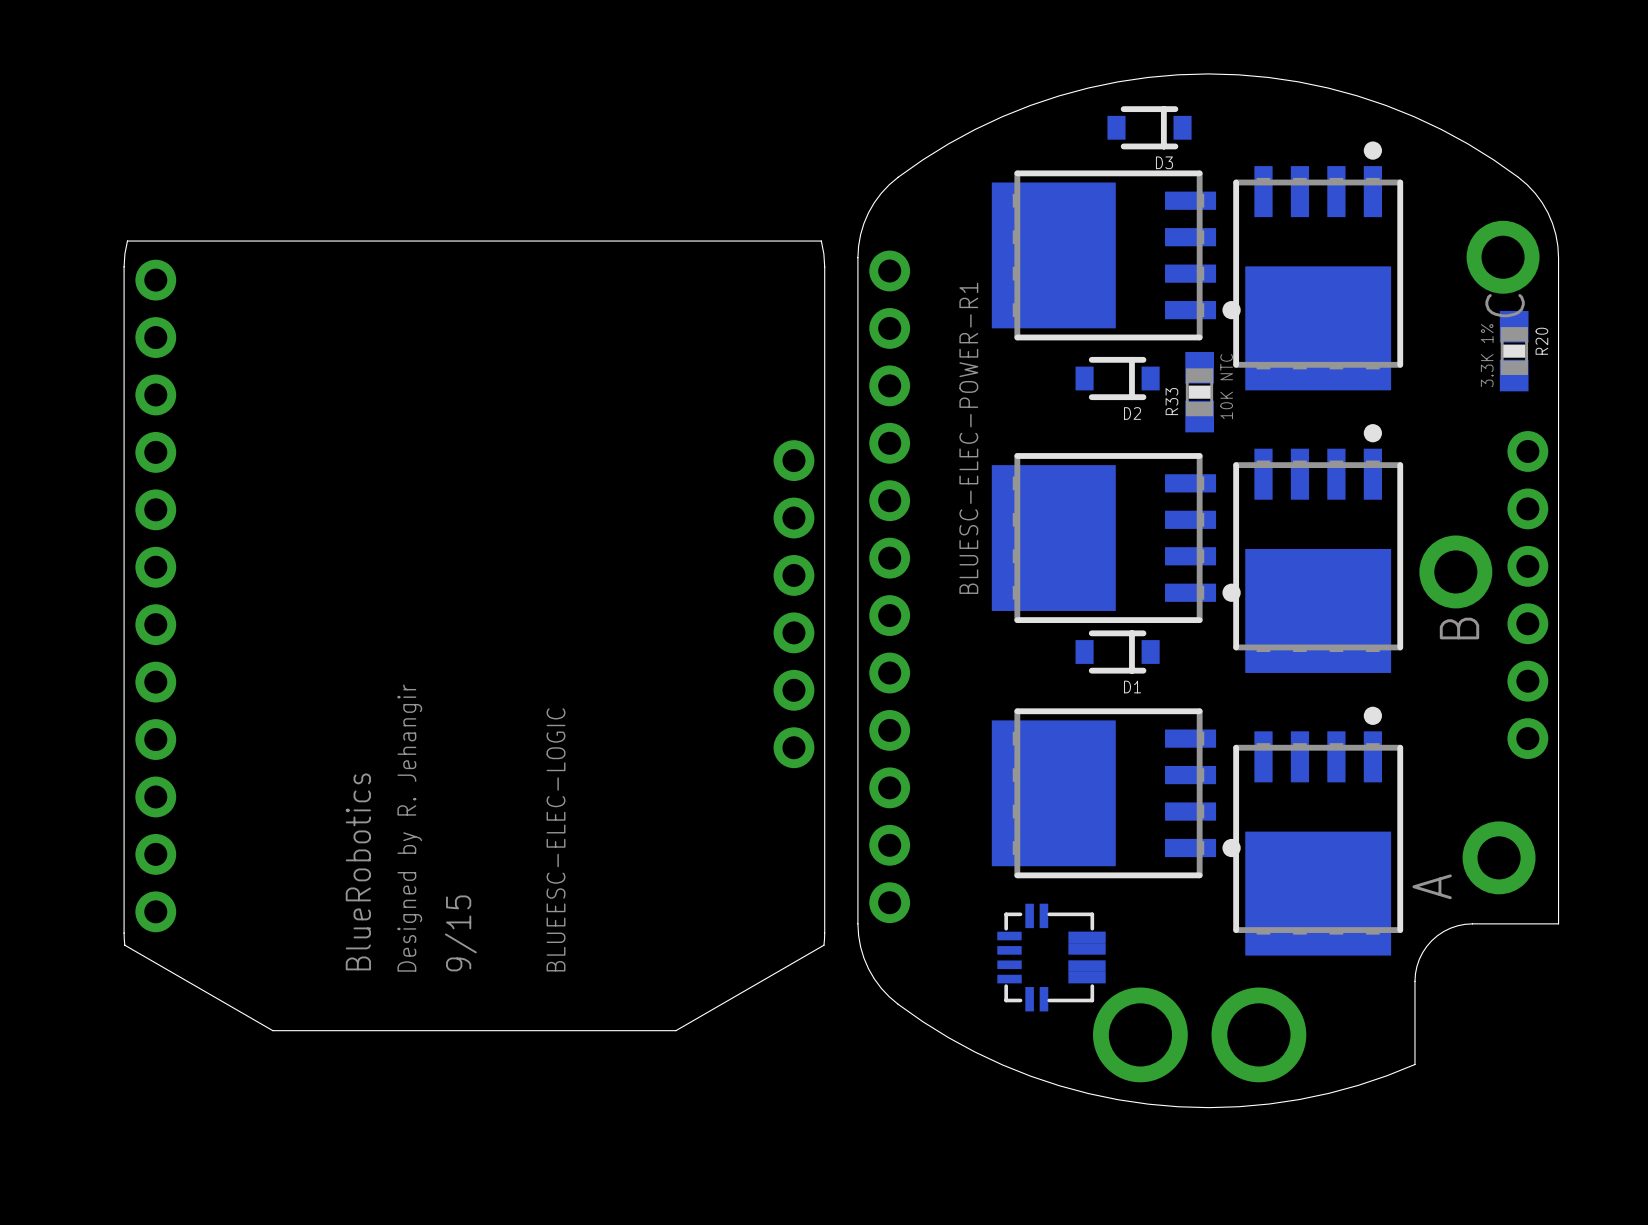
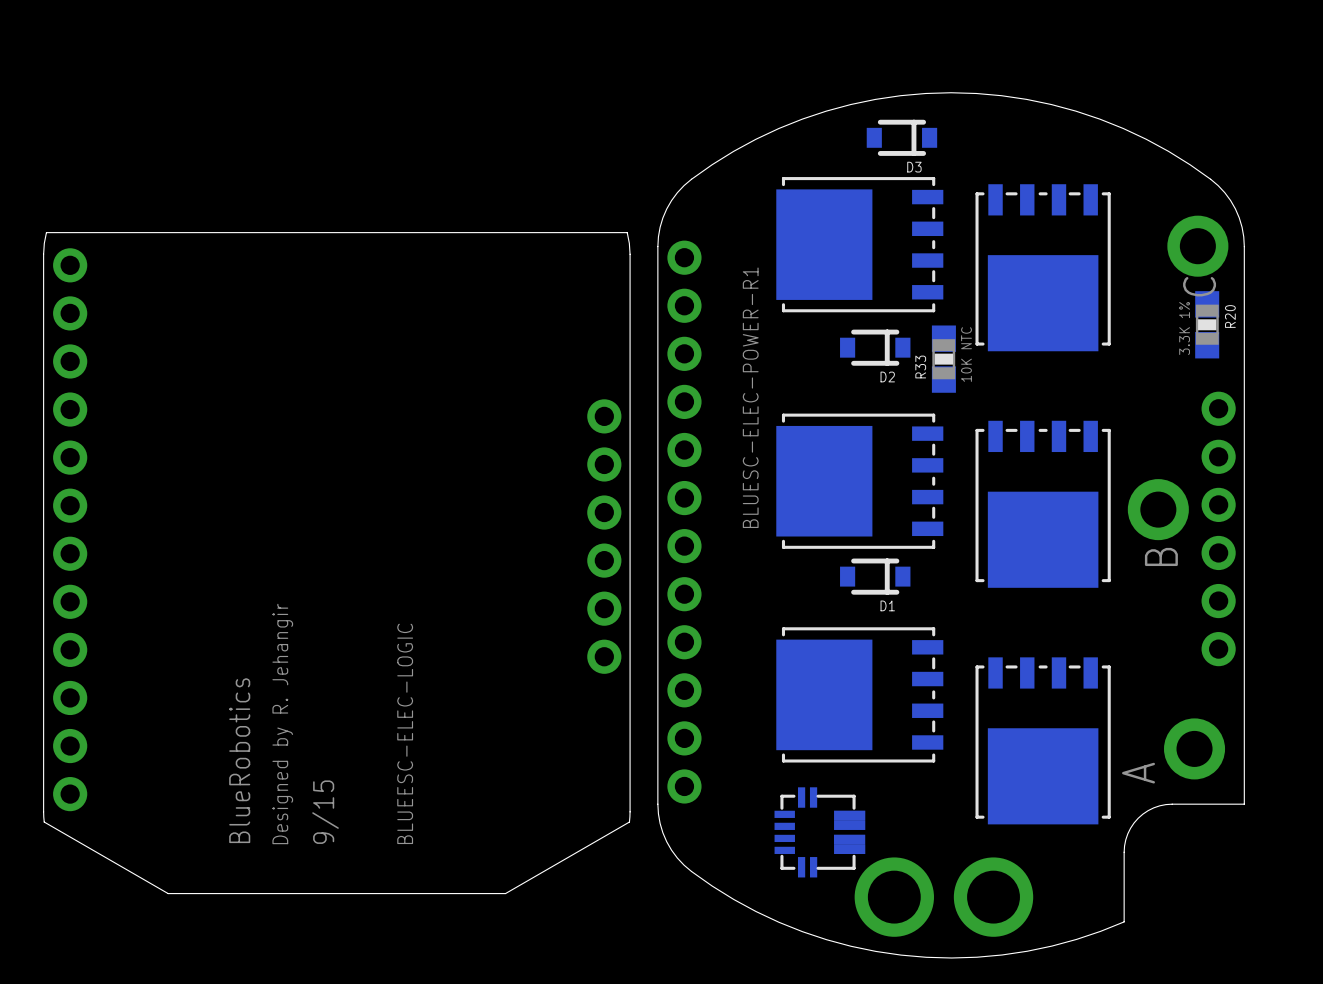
part footprint: [1233, 141, 1404, 391] -> [975, 184, 1111, 352]
part footprint: [991, 170, 1241, 341] -> [776, 177, 944, 313]
part footprint: [1233, 424, 1404, 673] -> [975, 420, 1111, 588]
part footprint: [991, 453, 1241, 624] -> [776, 413, 944, 549]
part footprint: [1233, 706, 1404, 956] -> [975, 657, 1111, 825]
part footprint: [991, 708, 1241, 879] -> [776, 627, 944, 763]

